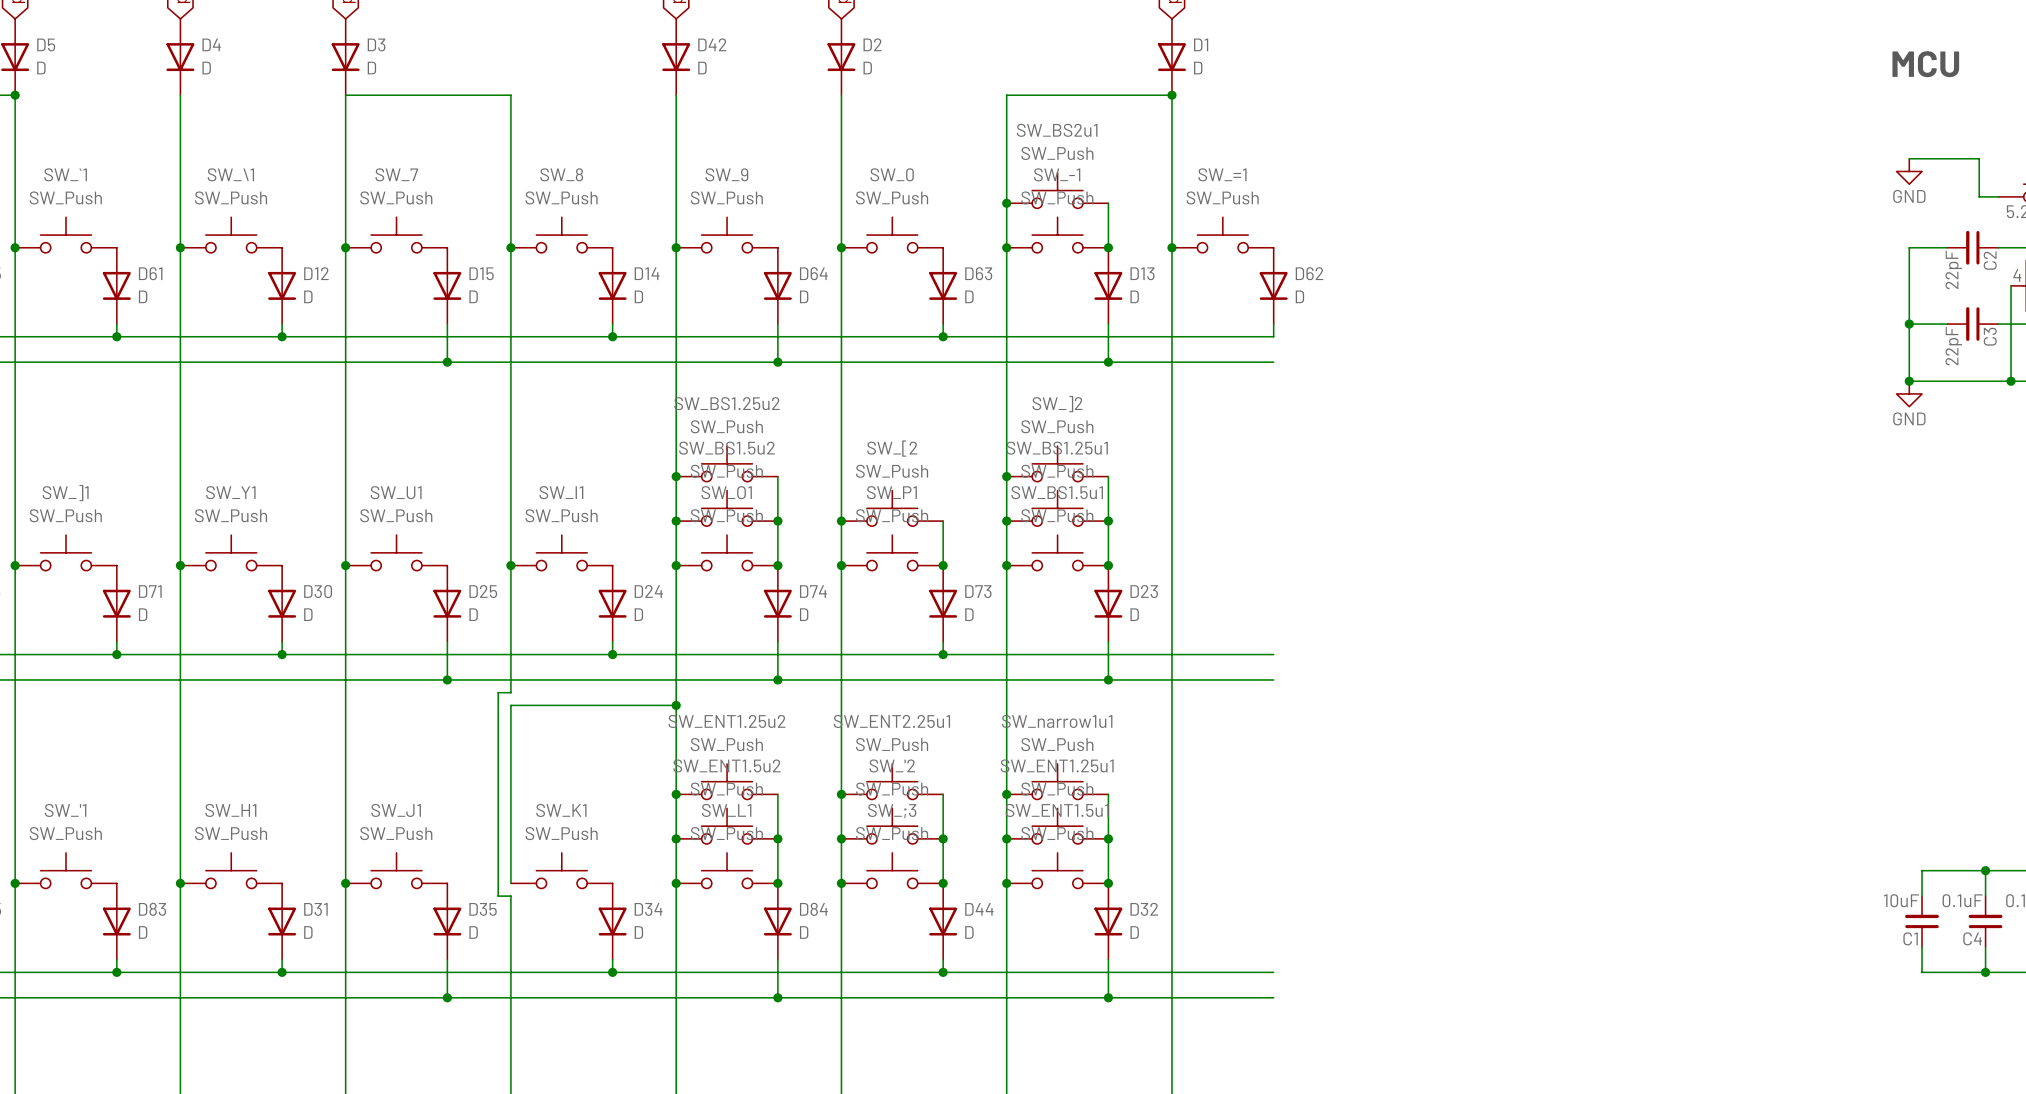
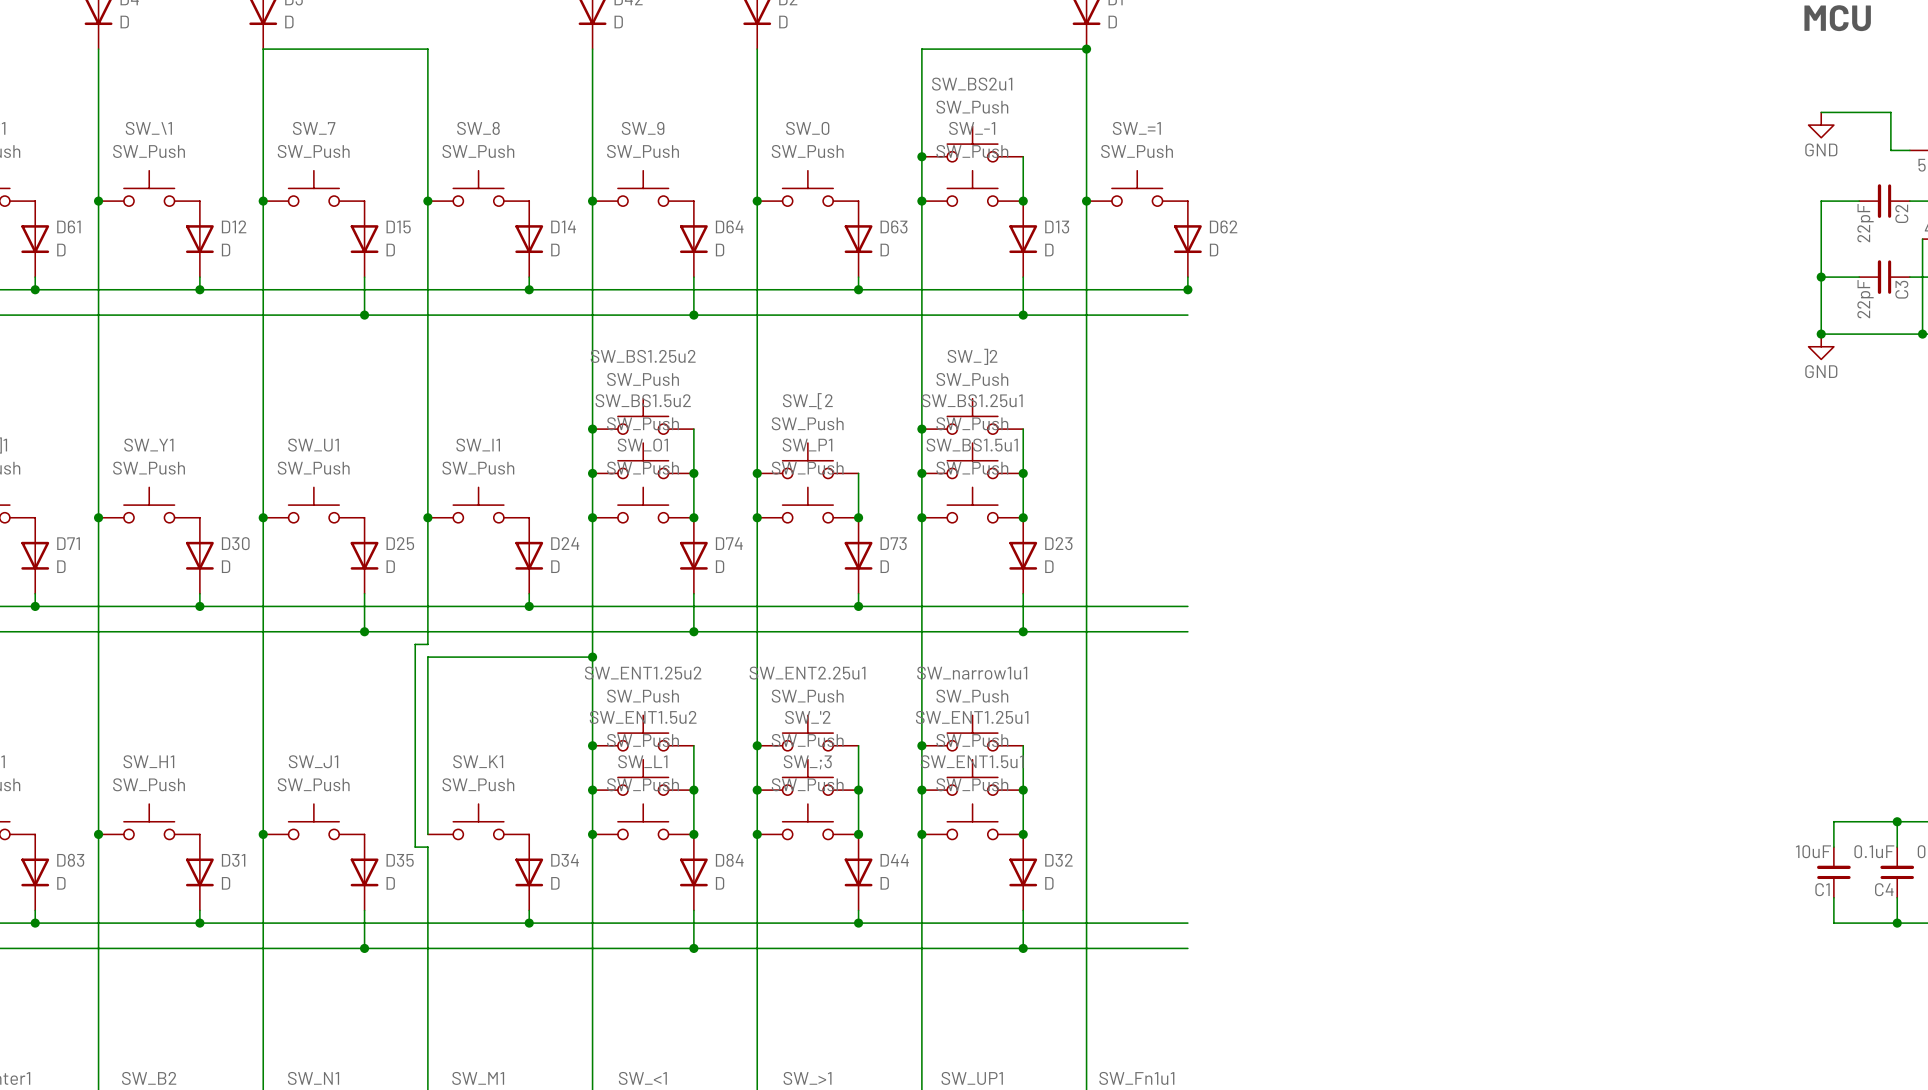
junction: none -> (1187, 289)

